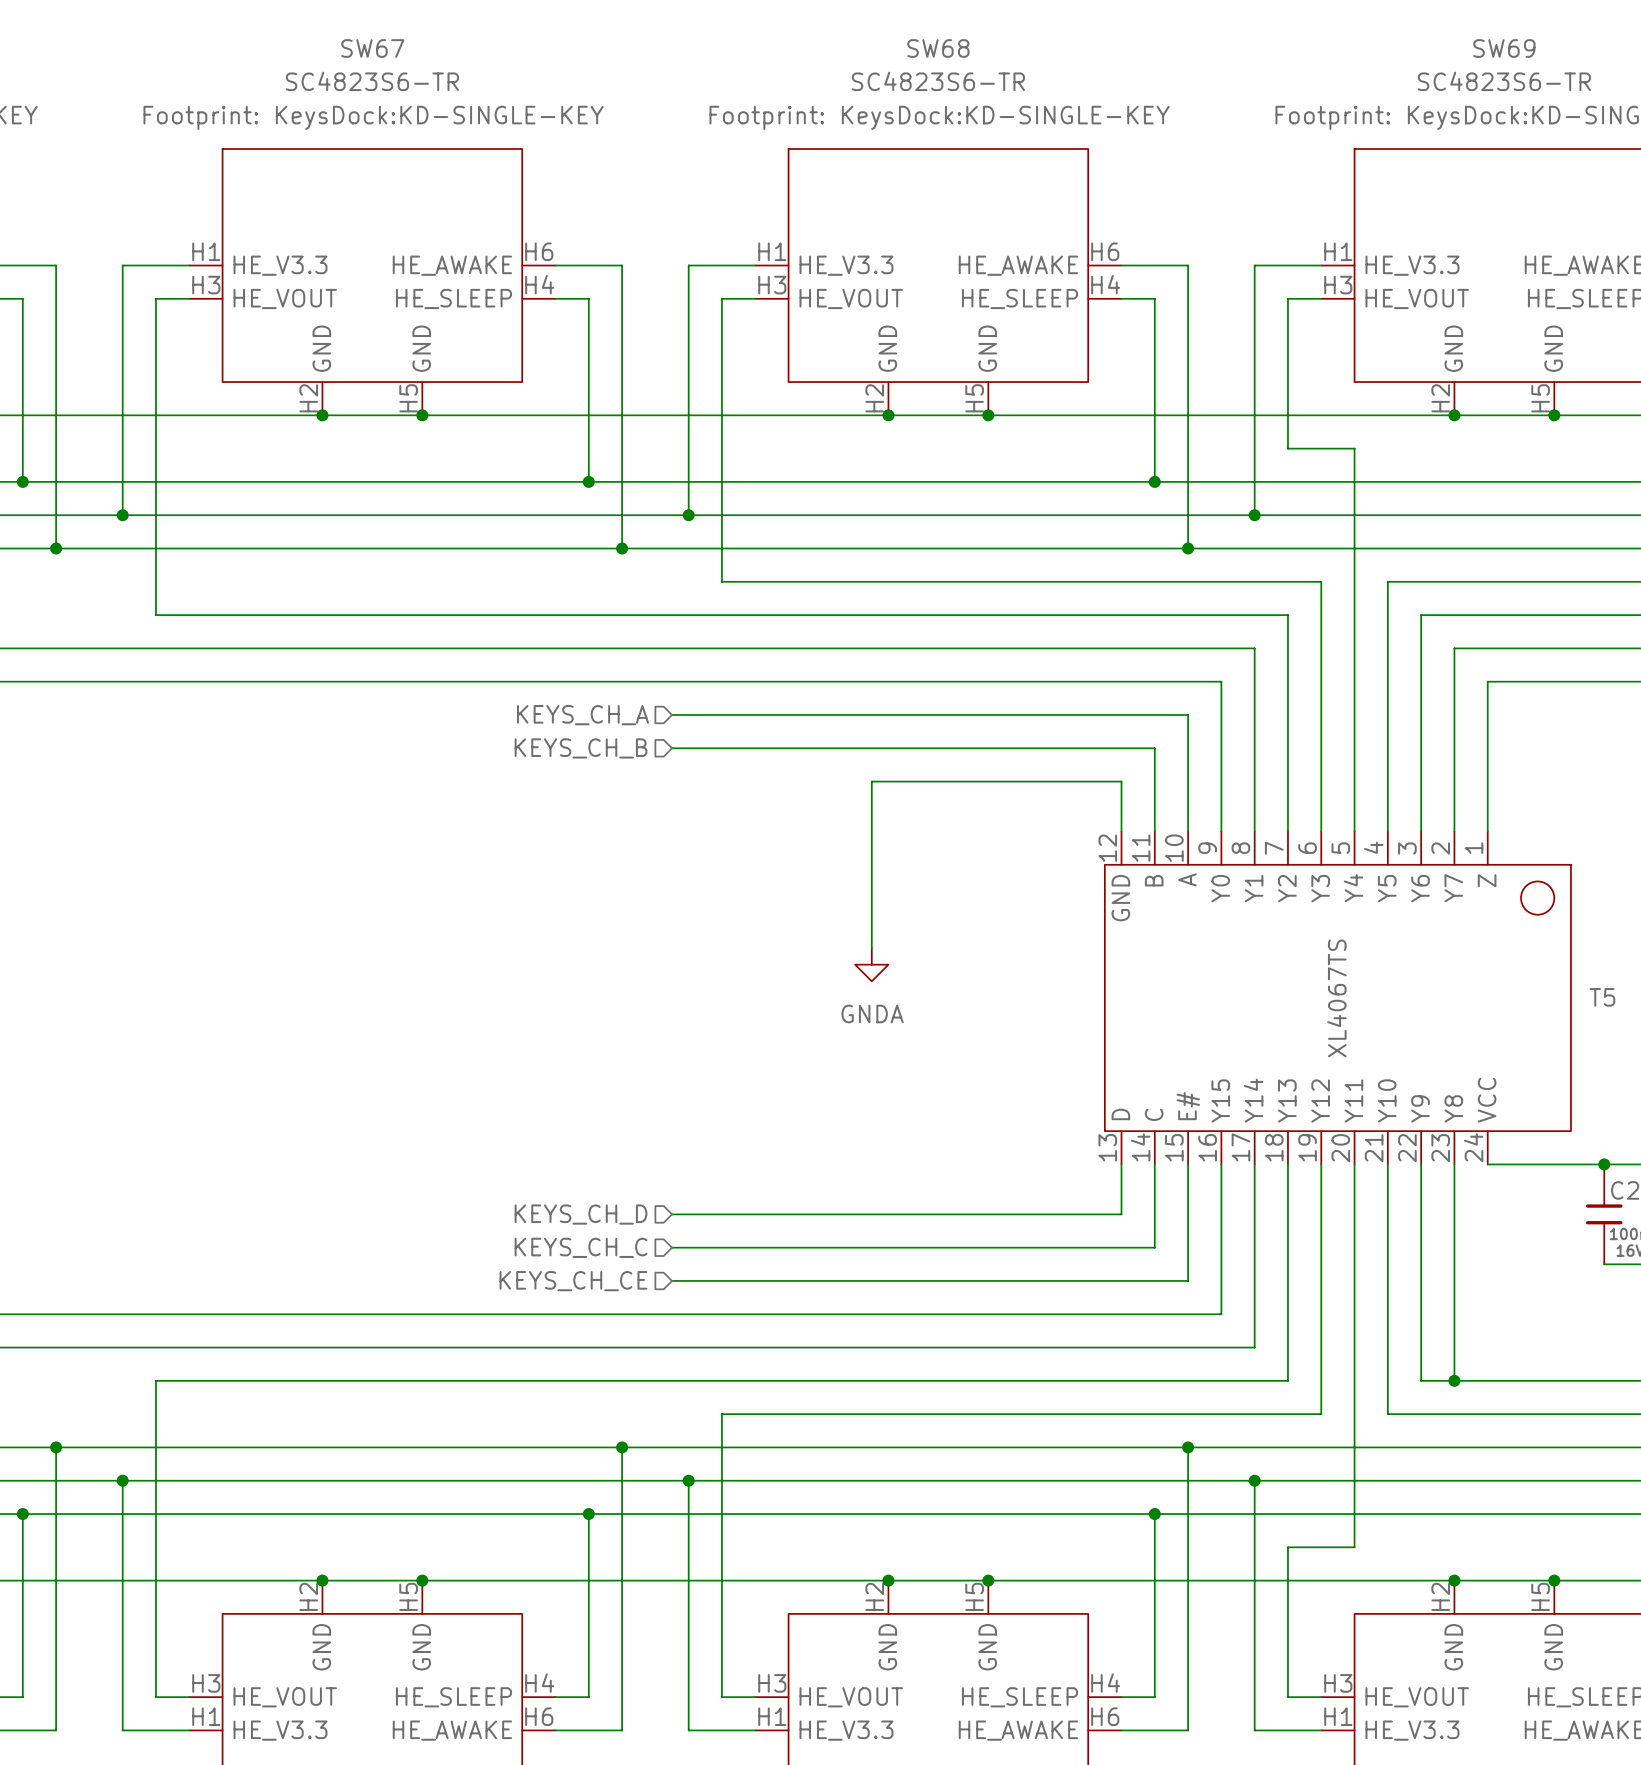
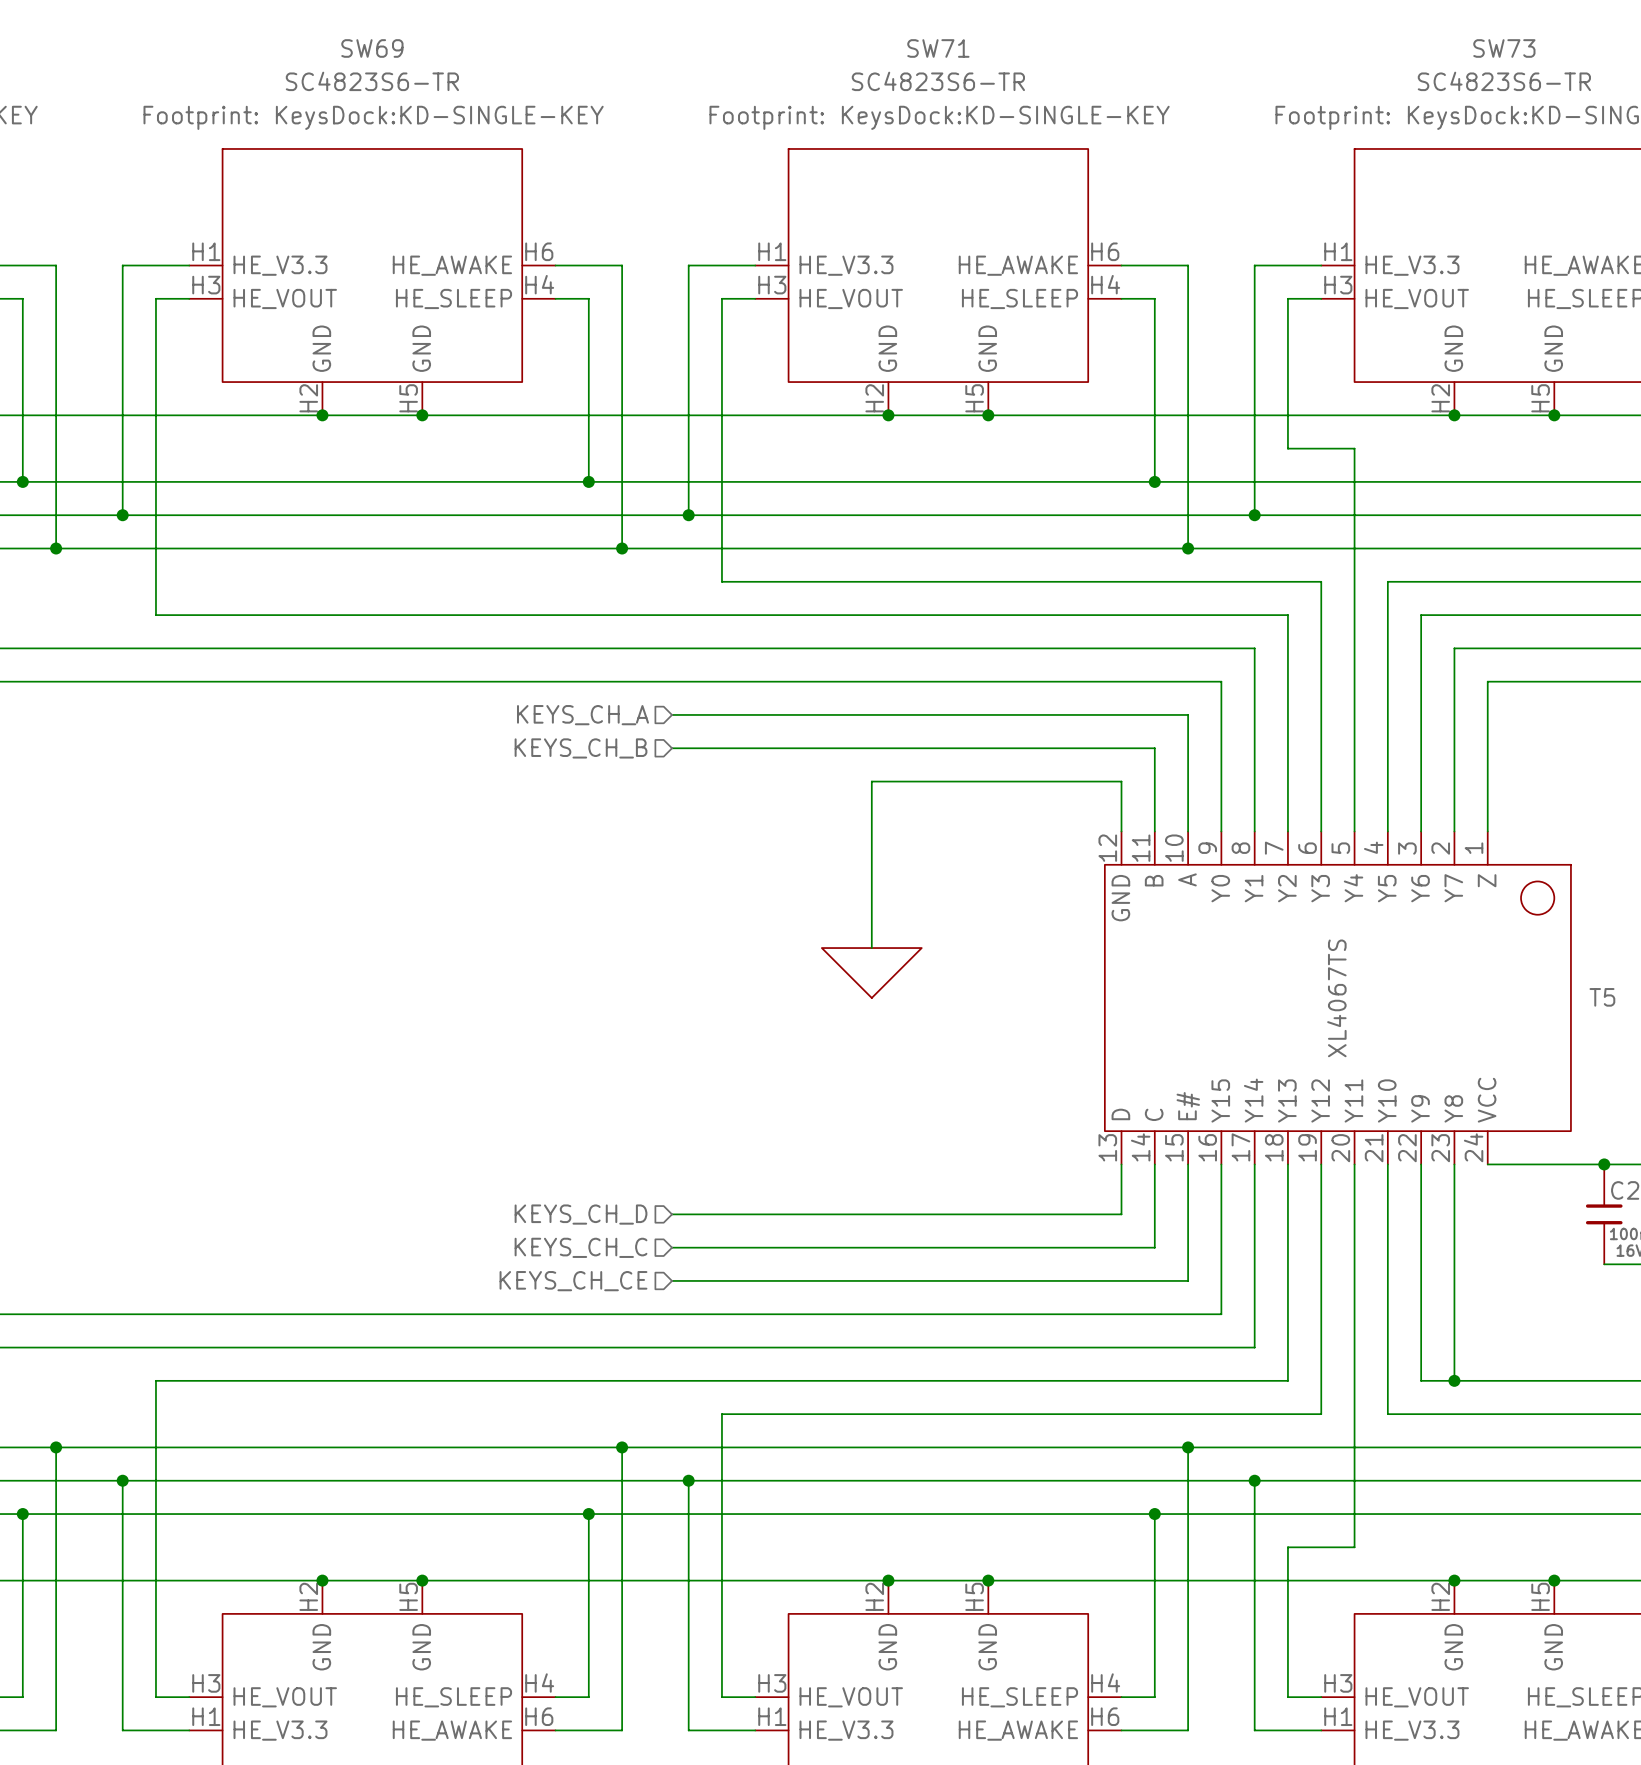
SW67 name: SW67 (372, 48) -> SW69 (372, 48)
SW68 name: SW68 (938, 48) -> SW71 (938, 48)
SW69 name: SW69 (1504, 48) -> SW73 (1504, 48)
power symbol shape: [855, 948, 889, 982] -> [821, 948, 922, 998]
power symbol text: GNDA (872, 1014) -> none

